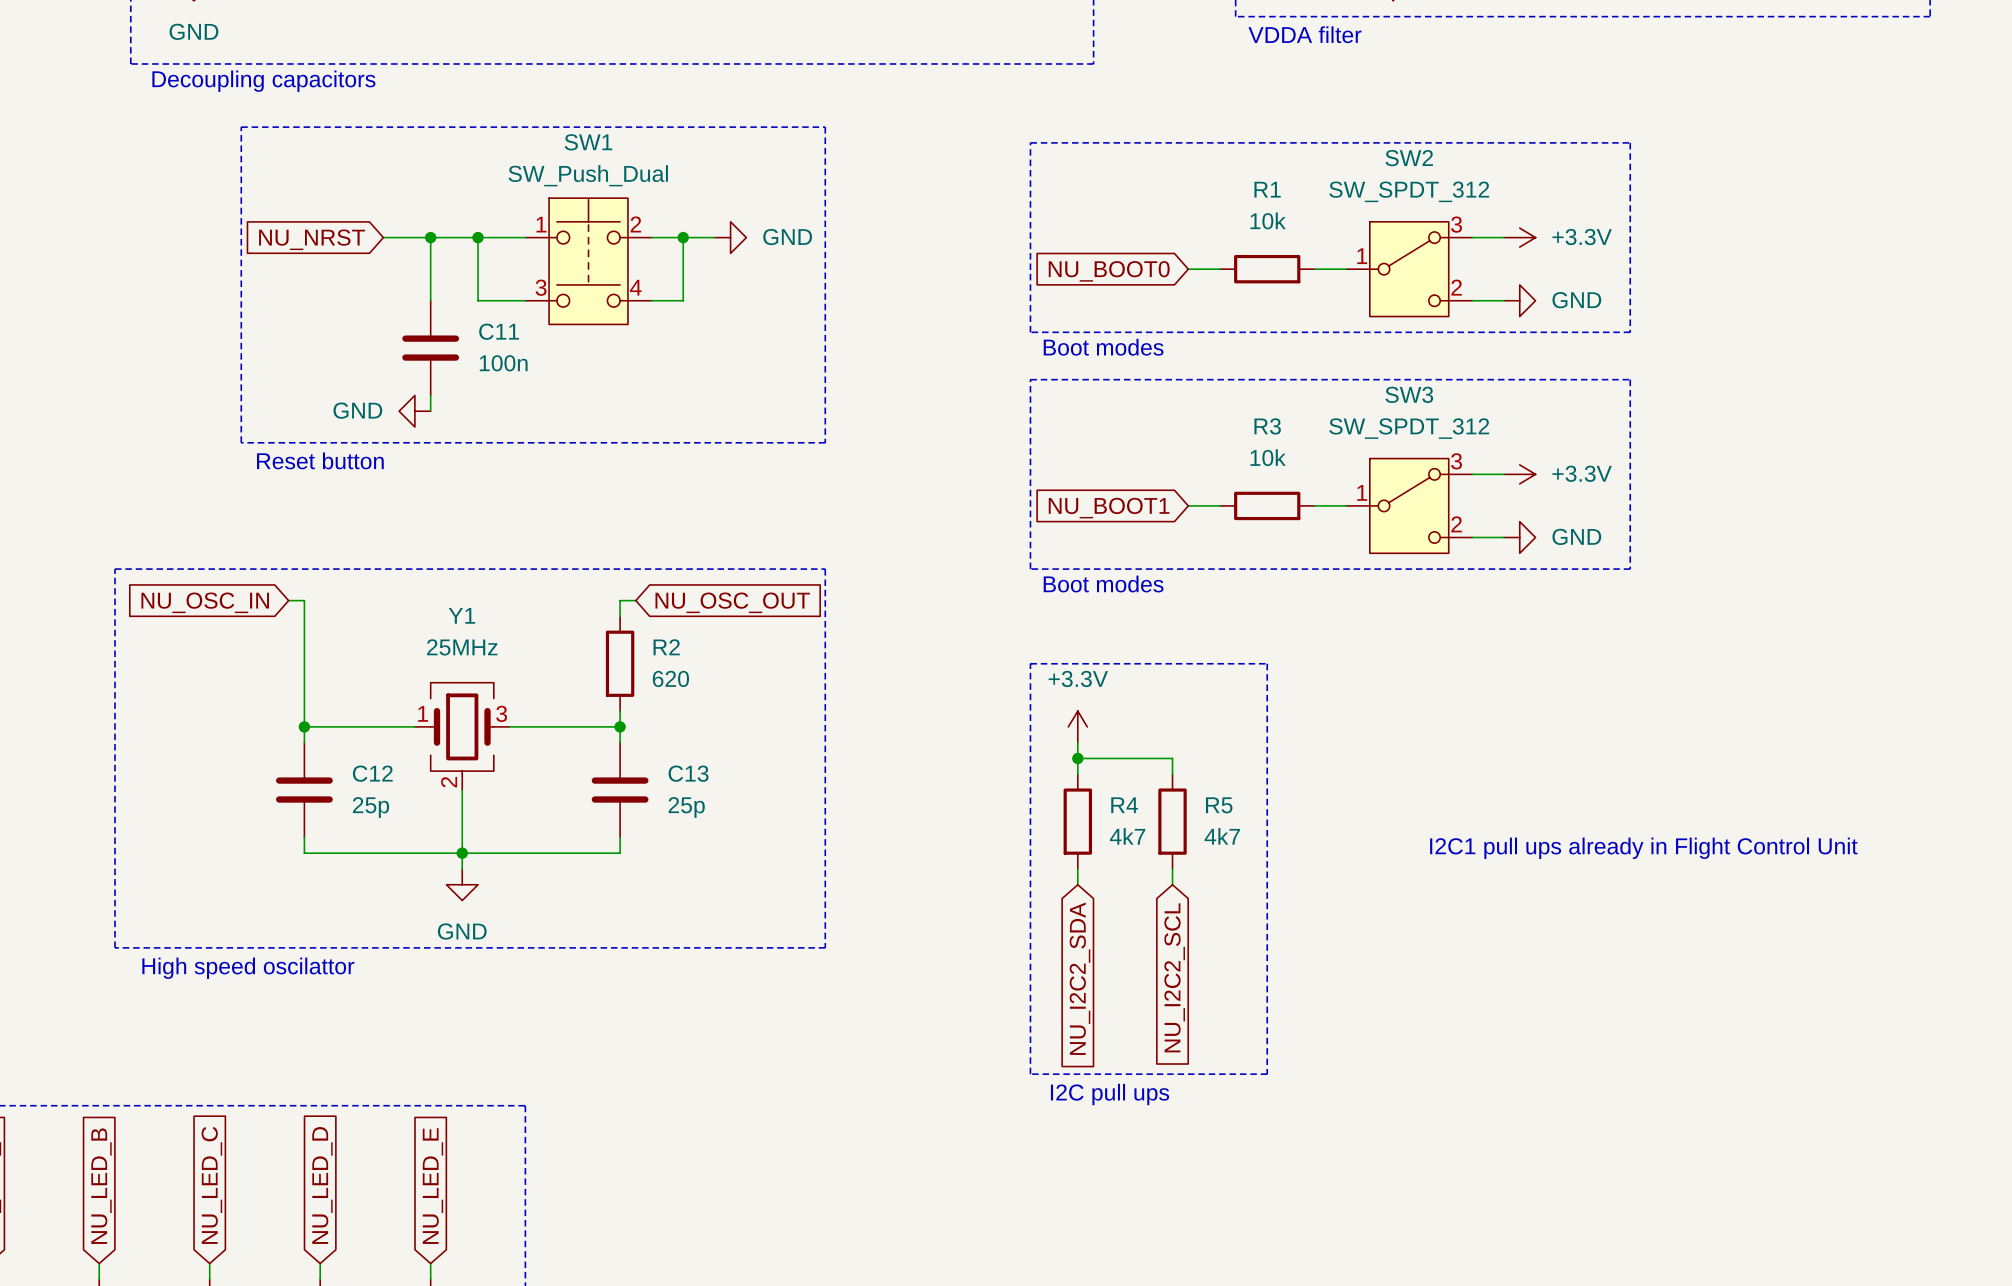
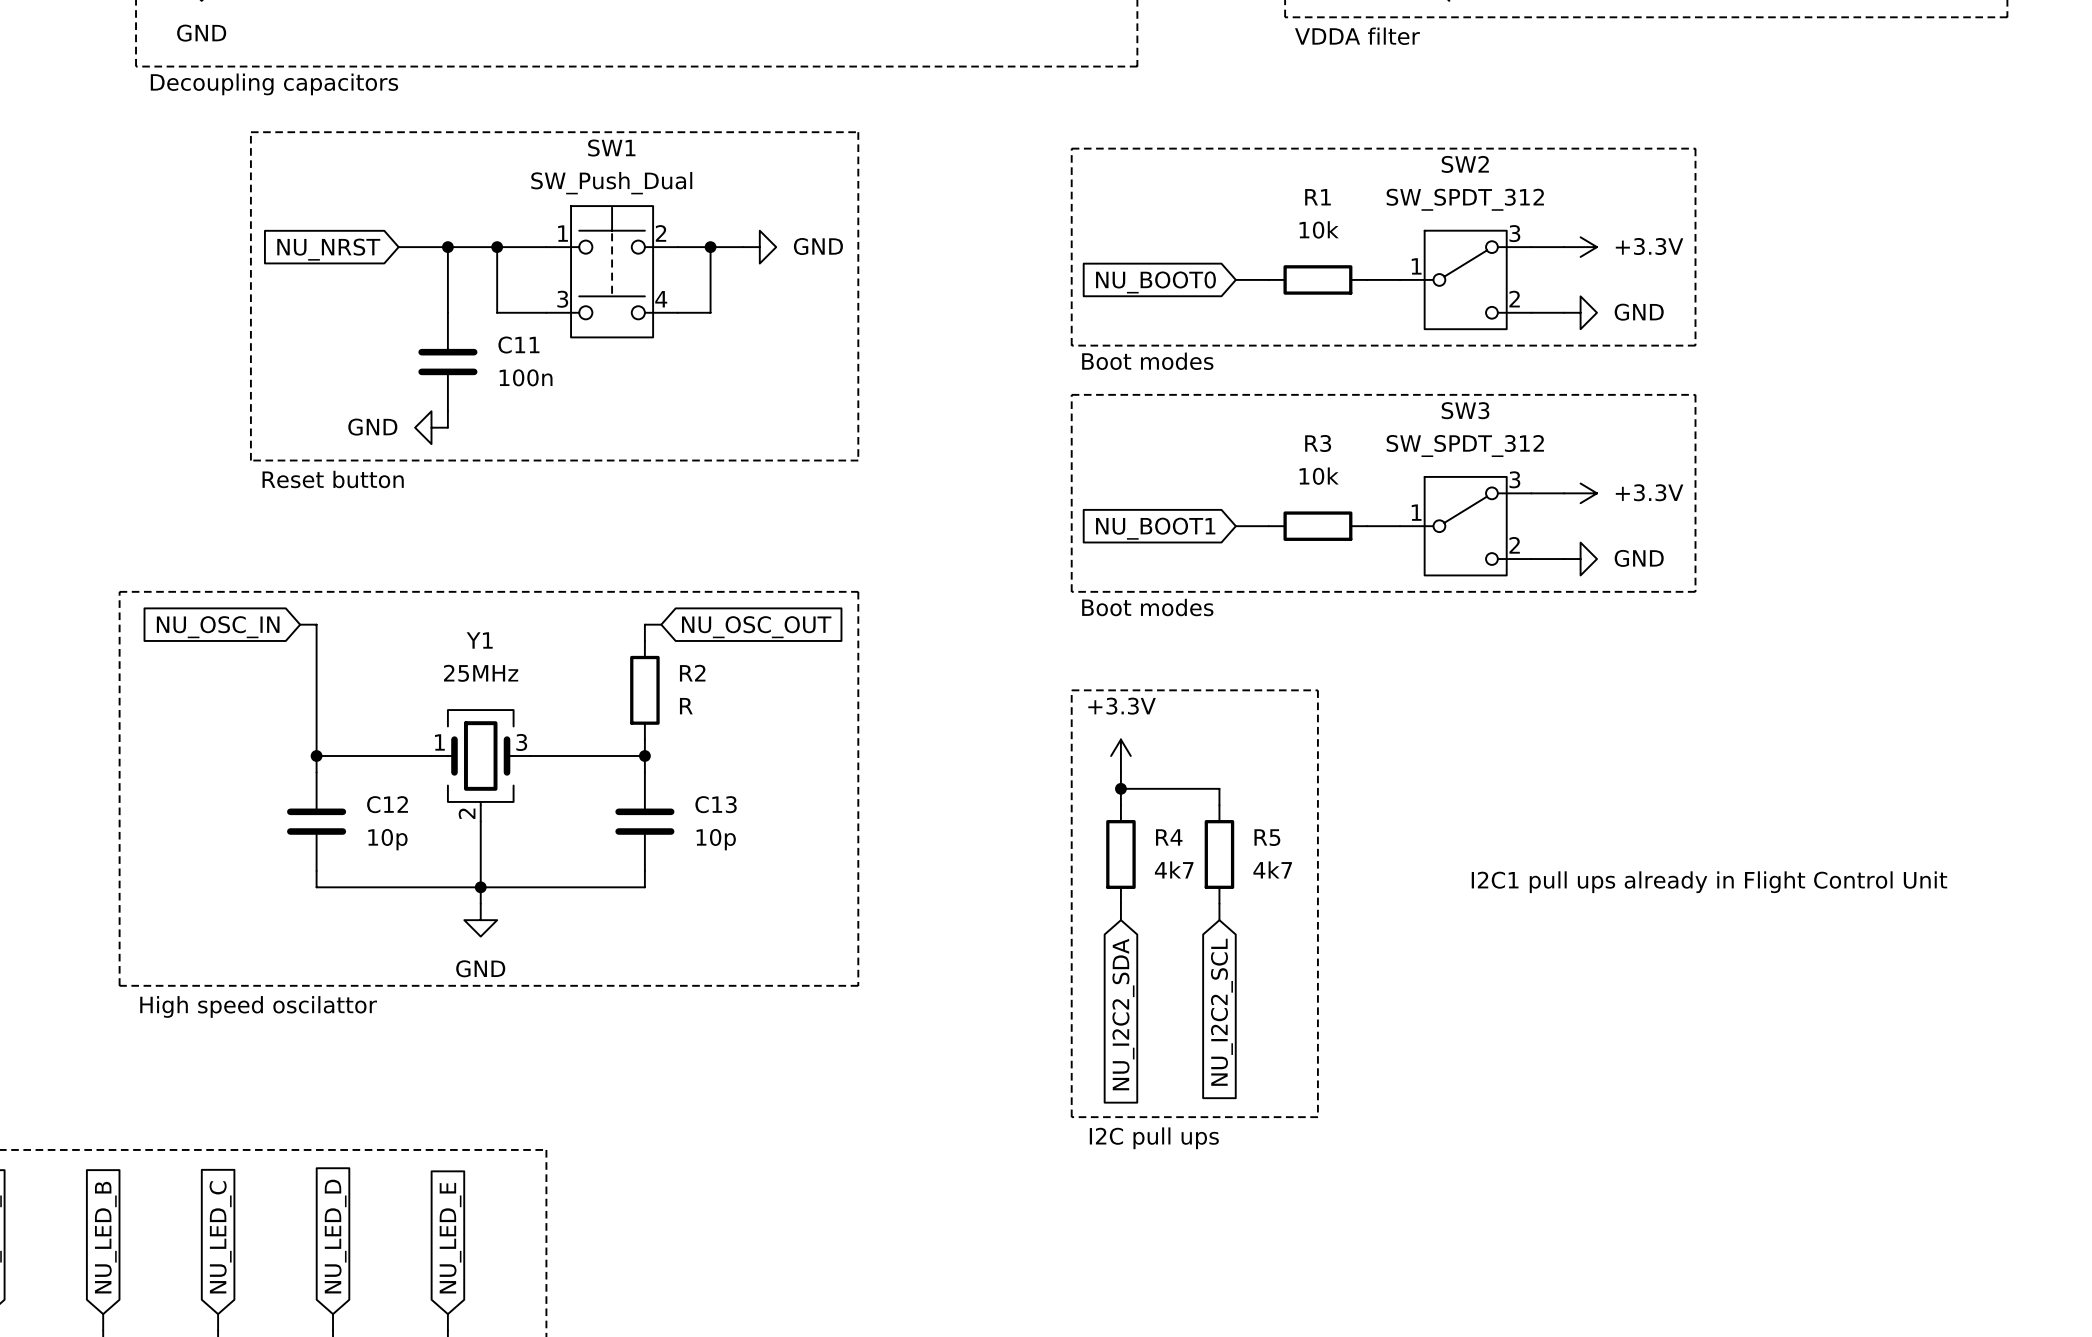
R2 value: 620 (670, 678) -> R (686, 706)
C12 value: 25p (370, 807) -> 10p (387, 839)
C13 value: 25p (686, 807) -> 10p (716, 839)

